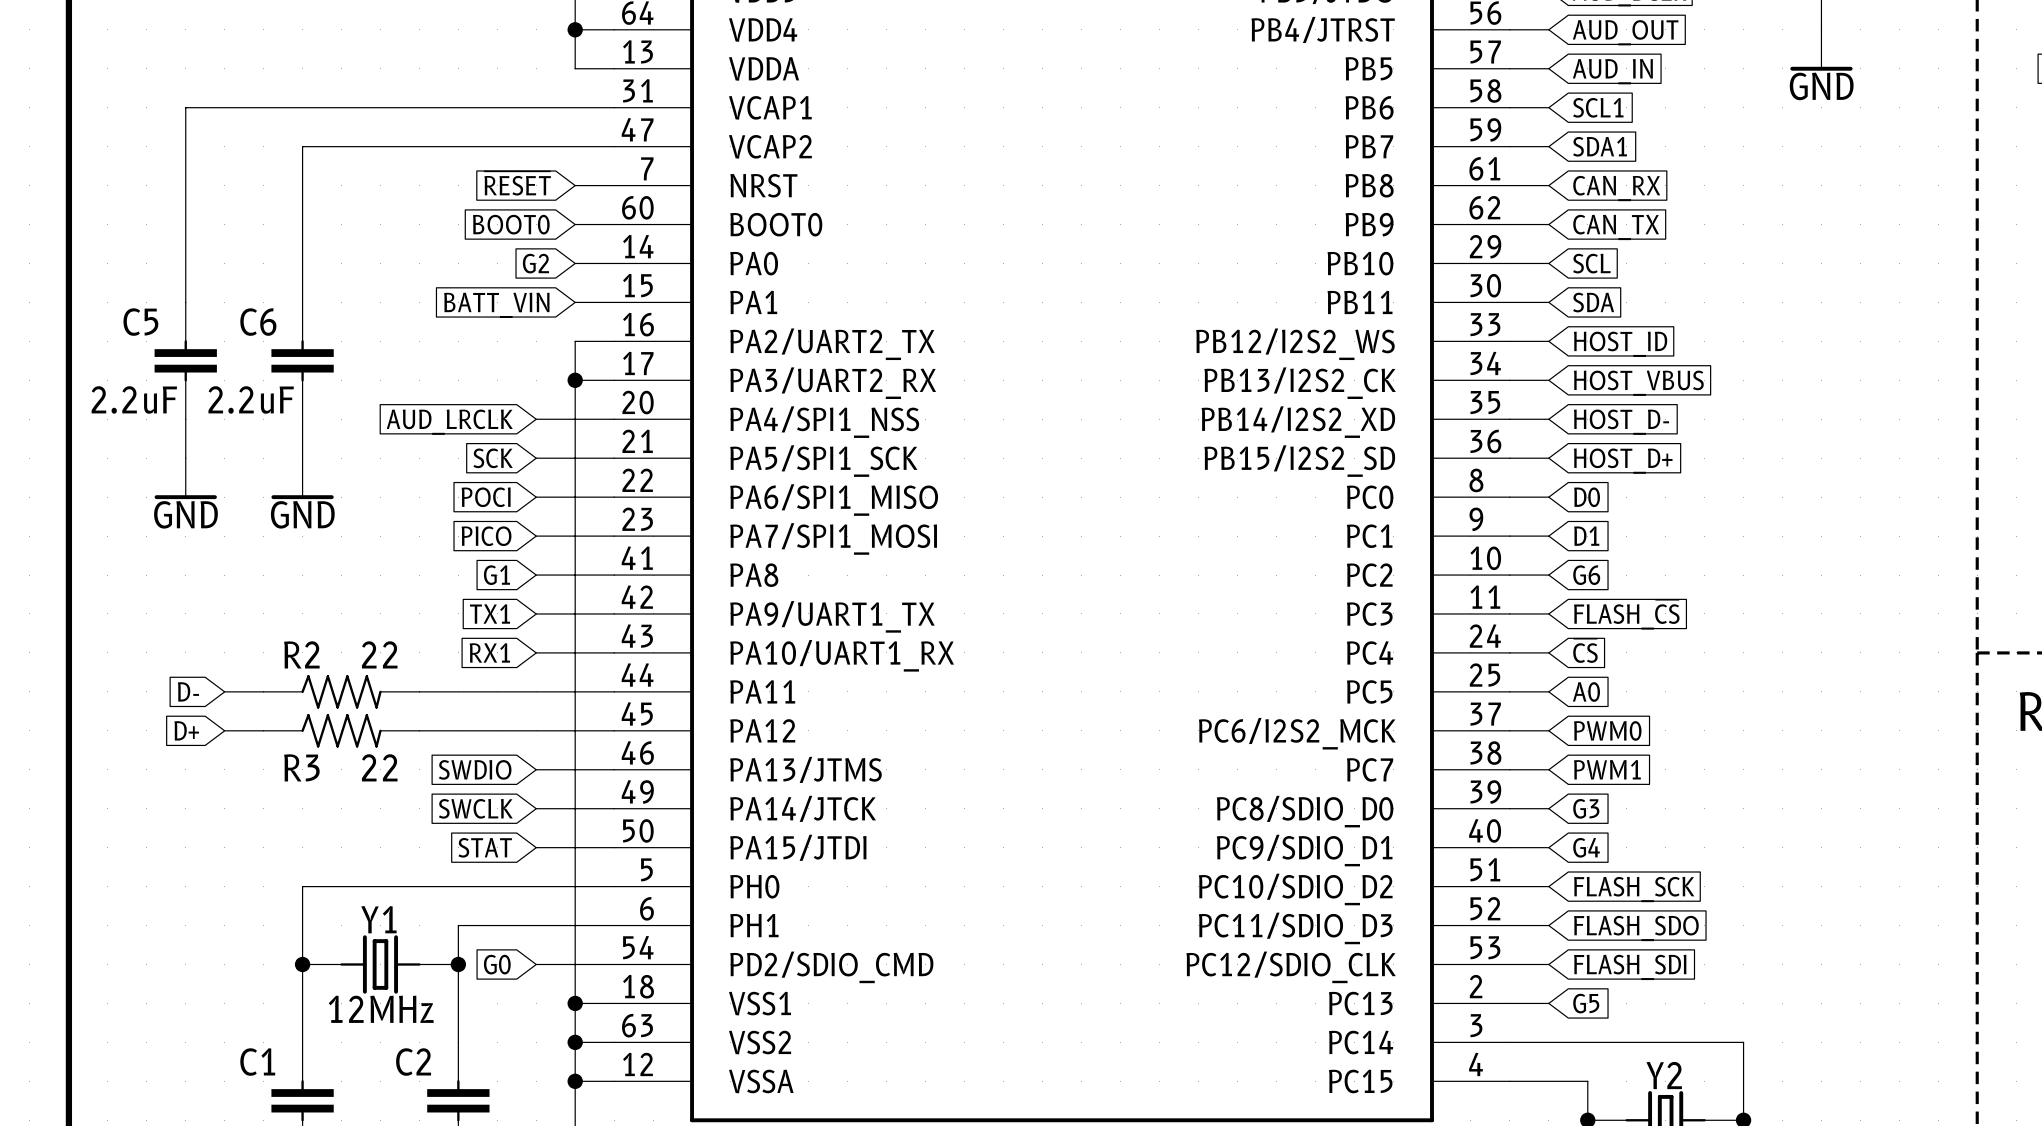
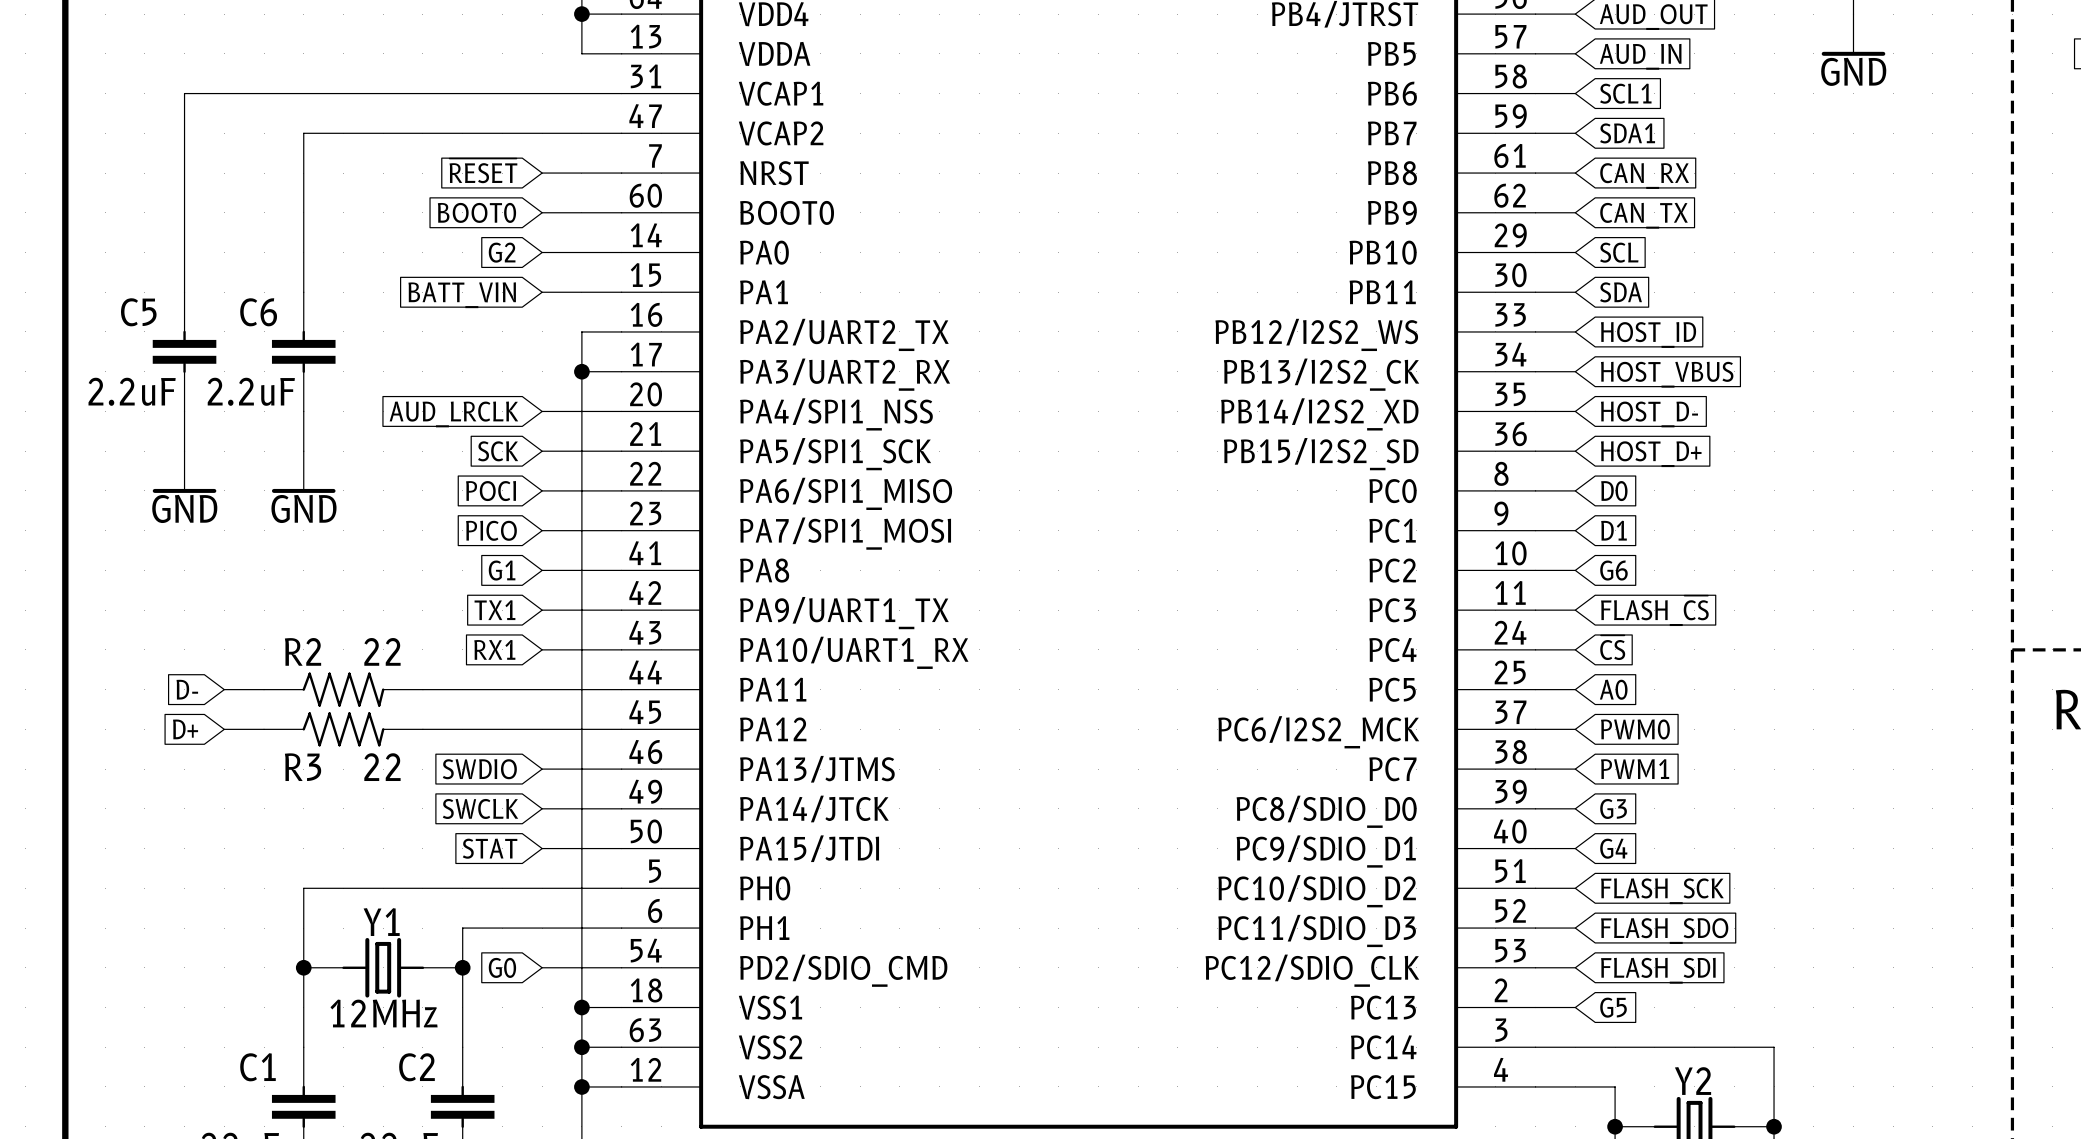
global label position: ~{RESET} (517, 183) -> ~{RESET} (483, 170)
wire: none -> (542, 173) (581, 173)
global label position: BOOT0 (511, 224) -> BOOT0 (476, 212)
wire: none -> (542, 212) (581, 212)
global label position: G2 (535, 263) -> G2 (502, 252)
wire: none -> (542, 252) (581, 252)
wire: none -> (542, 292) (581, 292)
global label position: BATT_VIN (496, 305) -> BATT_VIN (462, 295)

